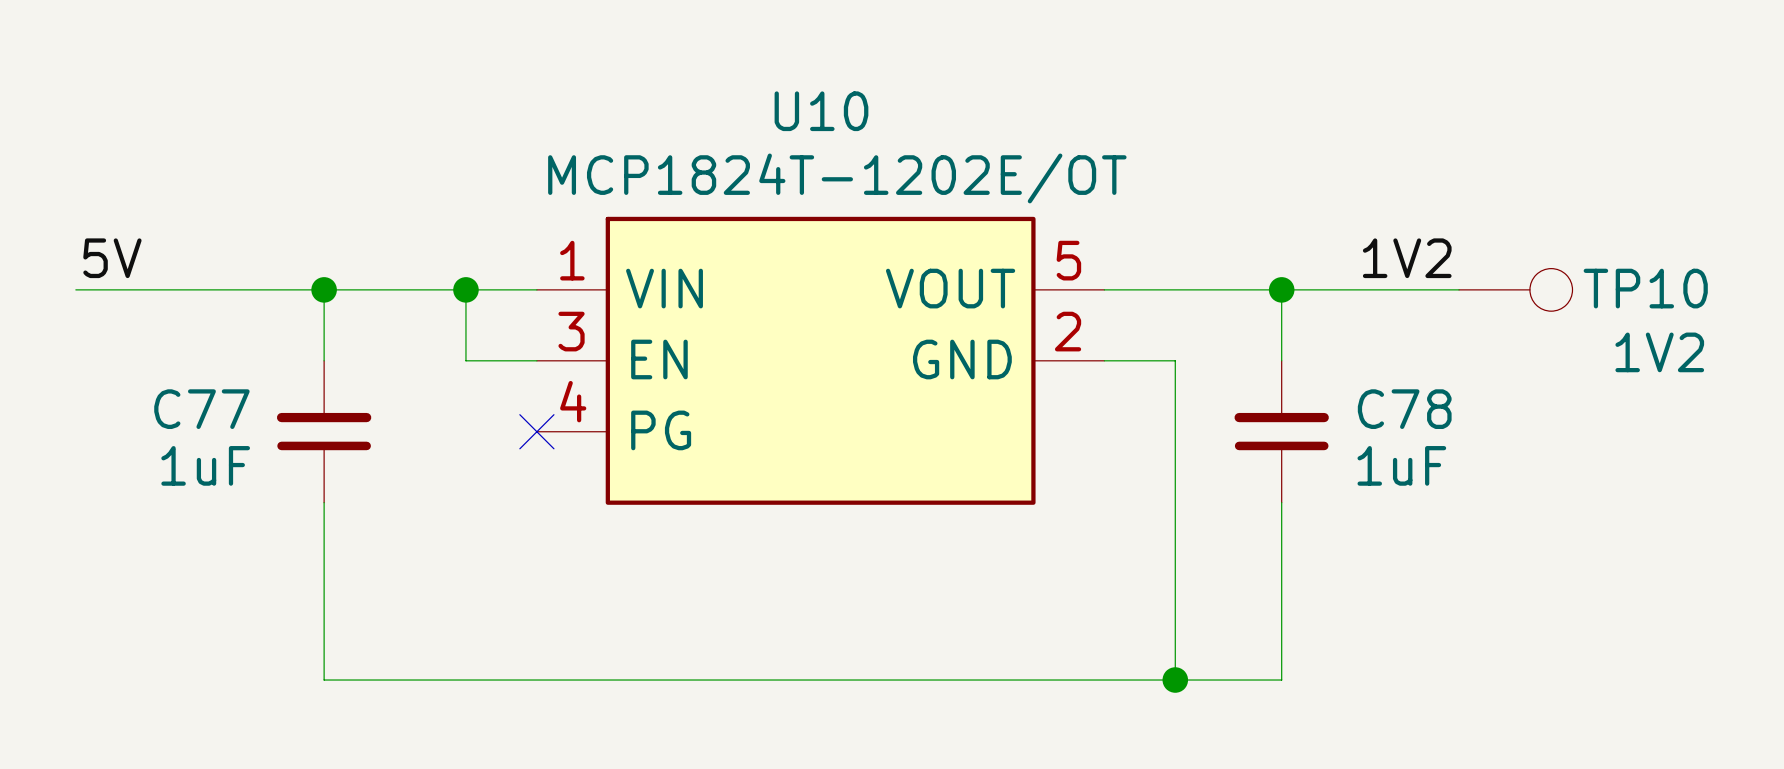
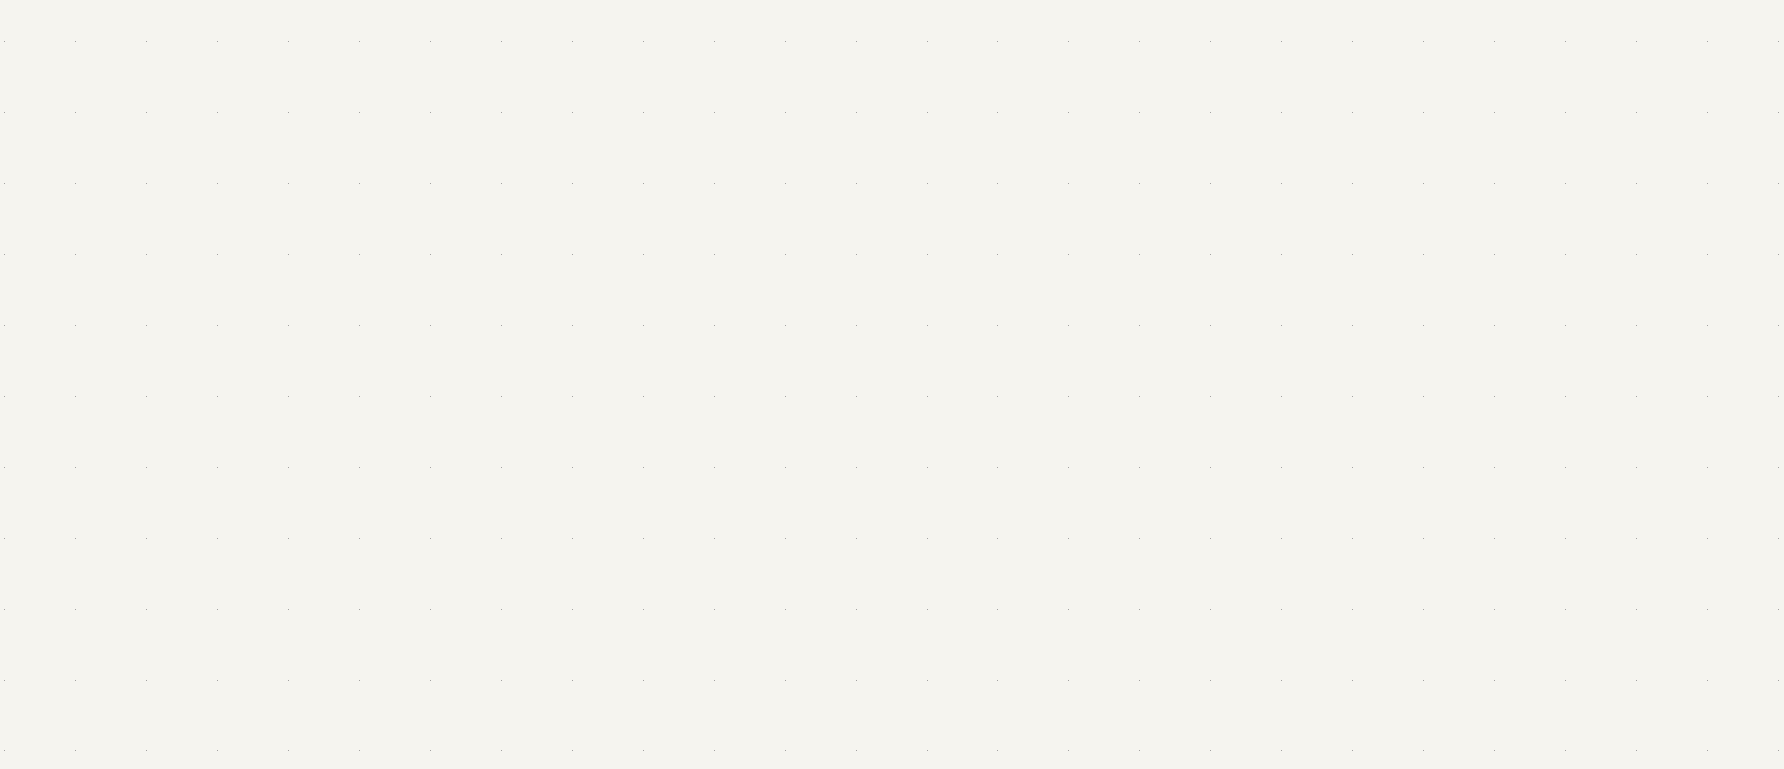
label: 5V (112, 258) -> none
label: 1V2 (1407, 258) -> none
wire: (75, 289) (536, 289) -> none
wire: (324, 289) (324, 360) -> none
junction: (324, 289) -> none
wire: (465, 289) (465, 360) (536, 360) -> none
junction: (465, 289) -> none
wire: (1104, 289) (1459, 289) -> none
wire: (1281, 289) (1281, 360) -> none
junction: (1281, 289) -> none
TP10: 1V2 (1515, 289) -> none
U10: MCP1824T-1202E/OT (820, 360) -> none
wire: (1104, 360) (1175, 360) (1175, 680) -> none
C77: 1uF (324, 431) -> none
no-connect mark: (536, 431) -> none
C78: 1uF (1281, 431) -> none
wire: (324, 502) (324, 680) (1281, 680) (1281, 502) -> none
junction: (1175, 680) -> none

